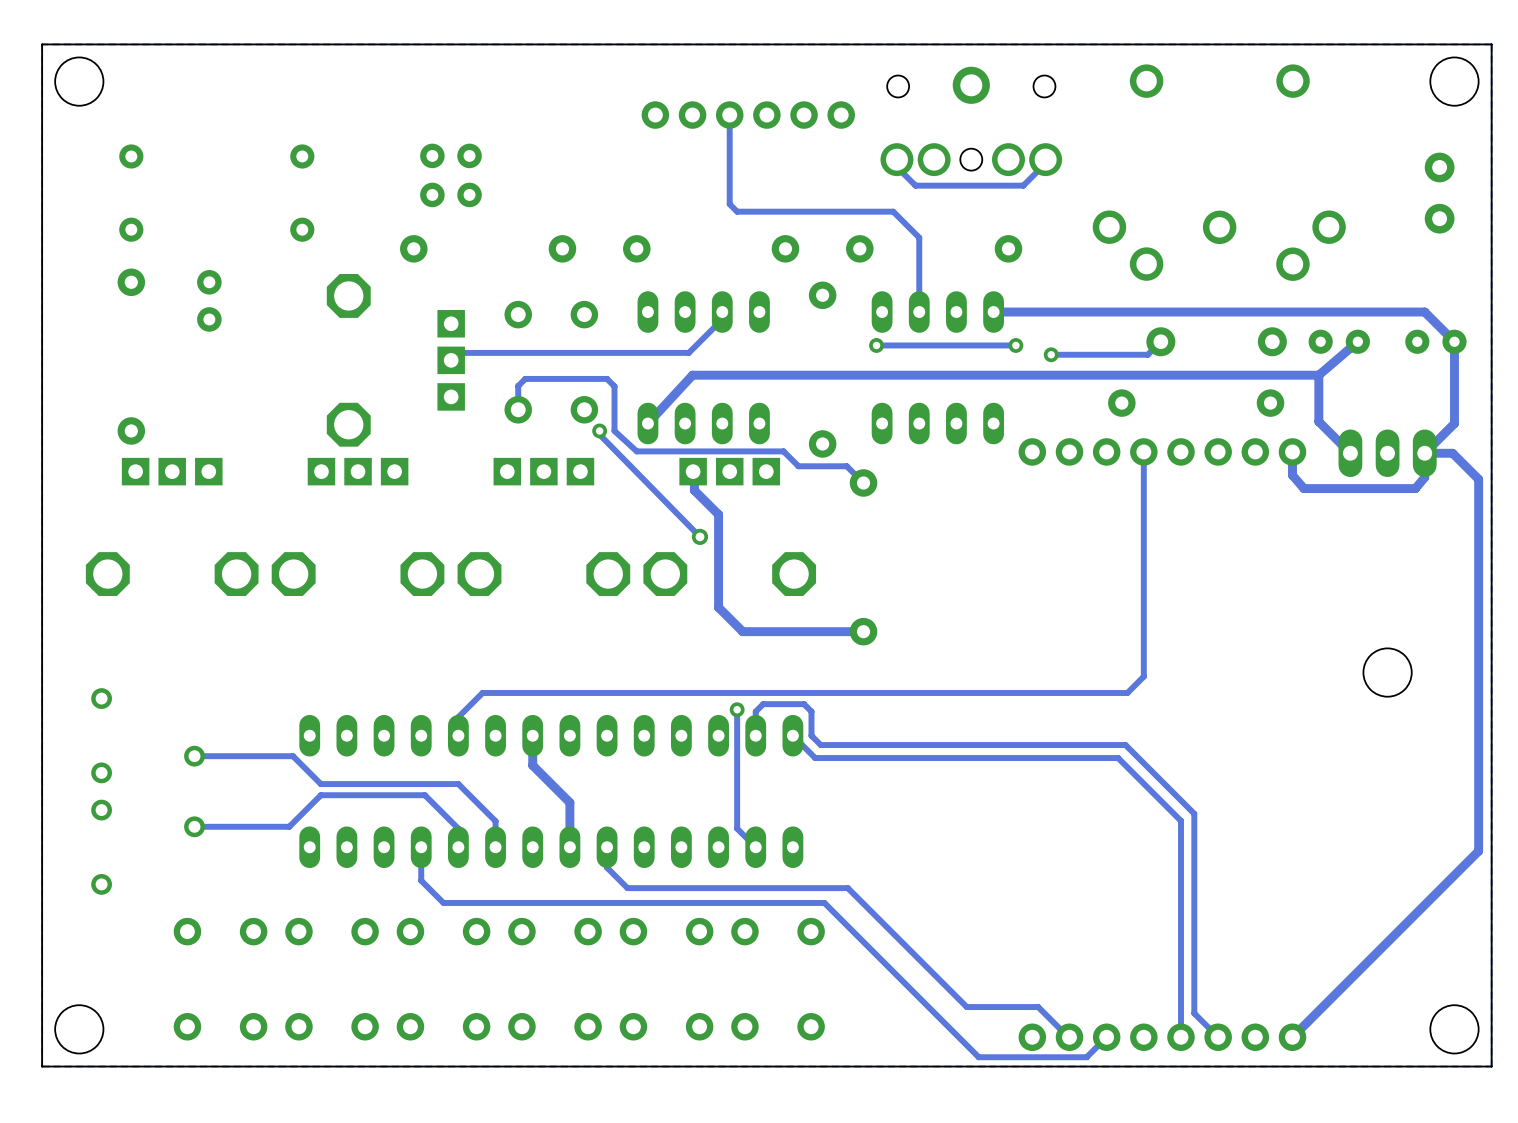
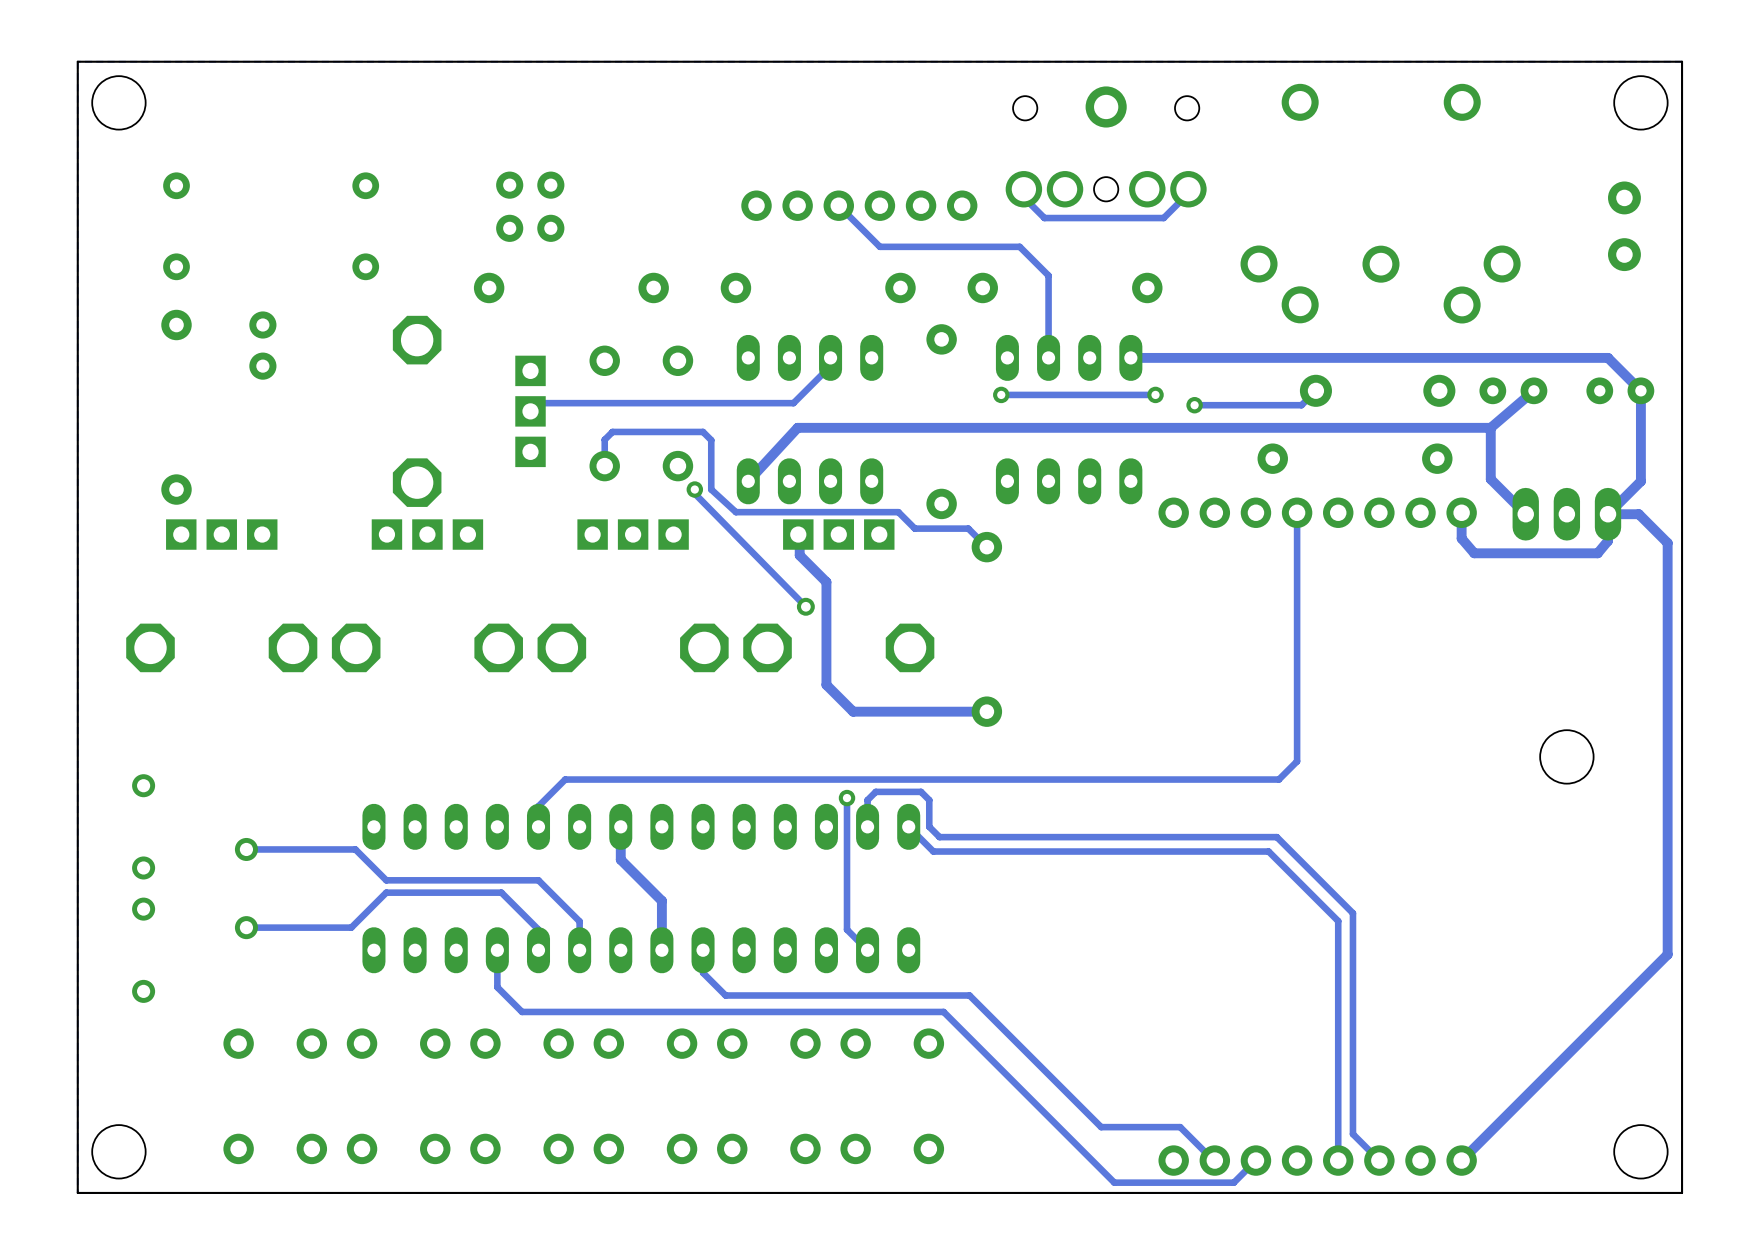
track: (729, 115) (729, 204) (737, 211) (766, 211) -> (838, 205) (879, 246)
part position: (748, 115) -> (859, 205)

